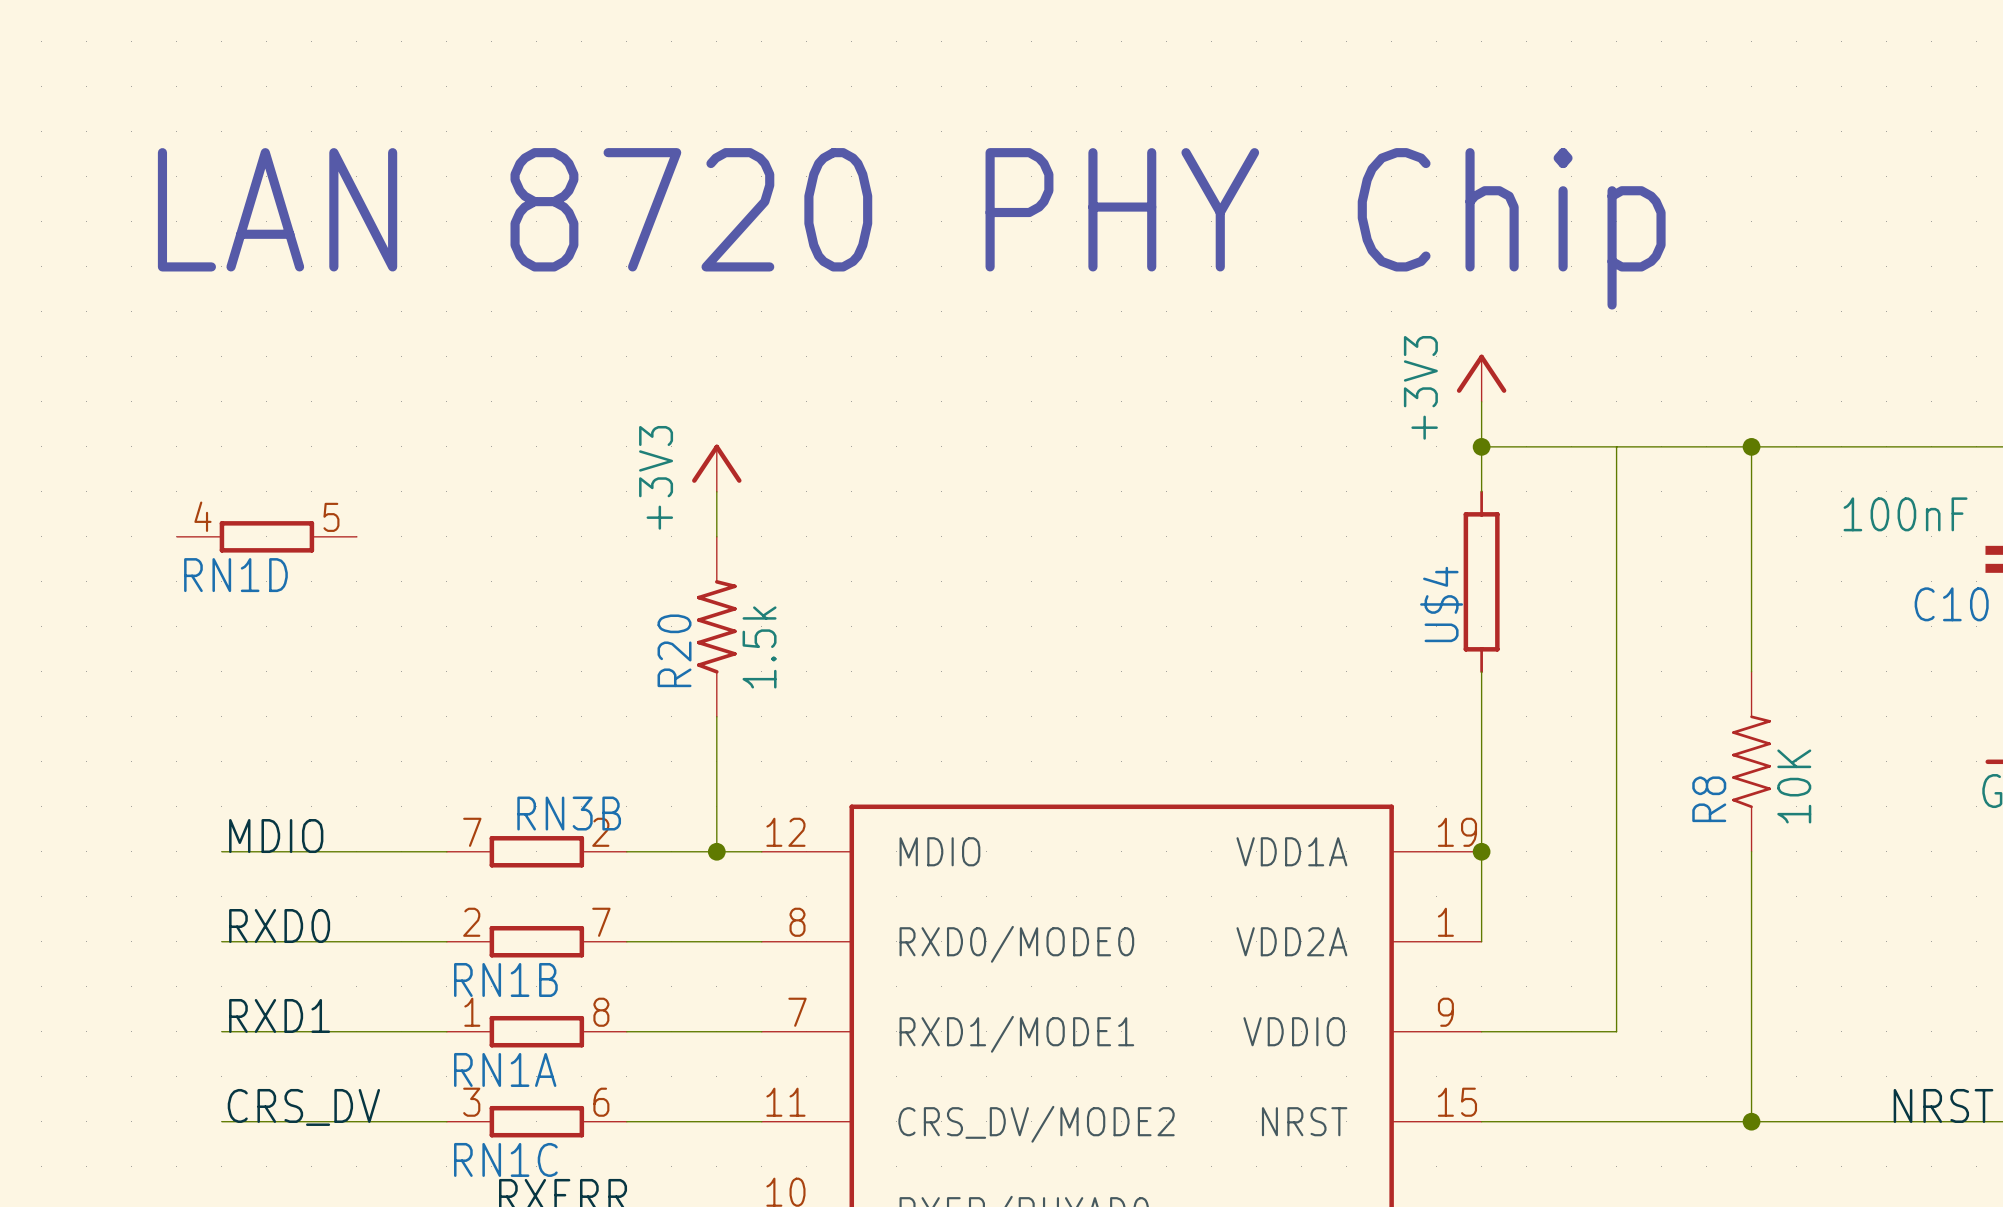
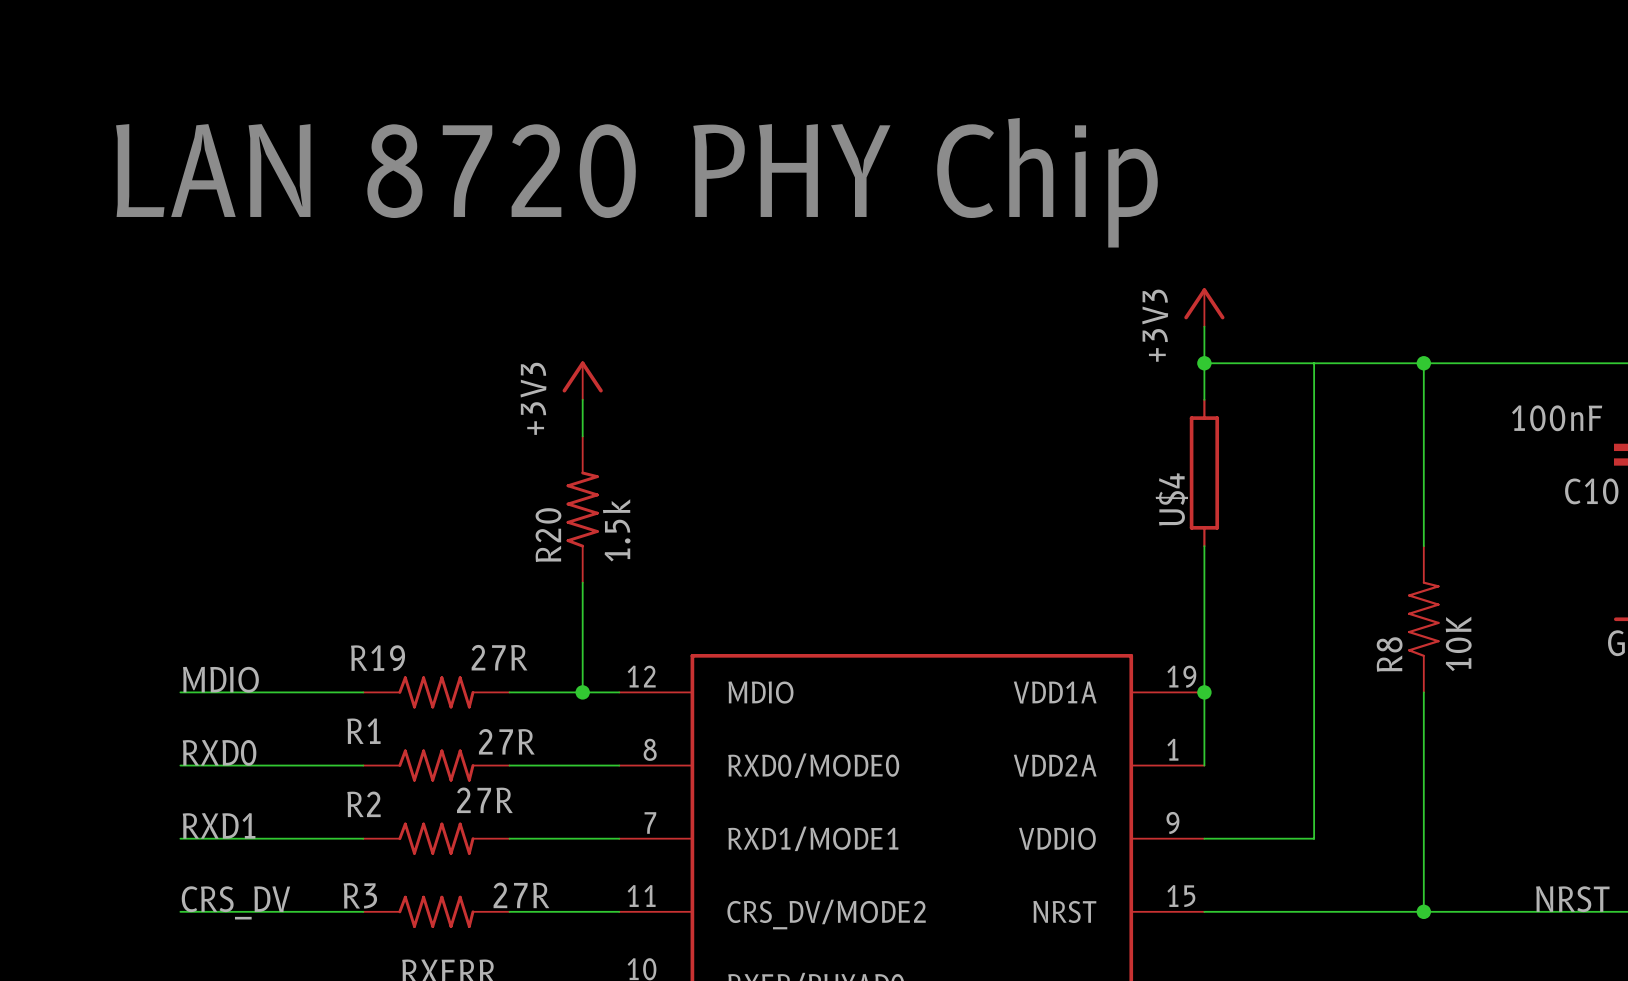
RN1D: (266, 536) -> none
RN3B: (536, 851) -> none
R19: none -> 27R (436, 692)
RN1B: (536, 941) -> none
R1: none -> 27R (436, 765)
RN1A: (536, 1031) -> none
R2: none -> 27R (436, 838)
RN1C: (536, 1121) -> none
R3: none -> 27R (436, 911)

